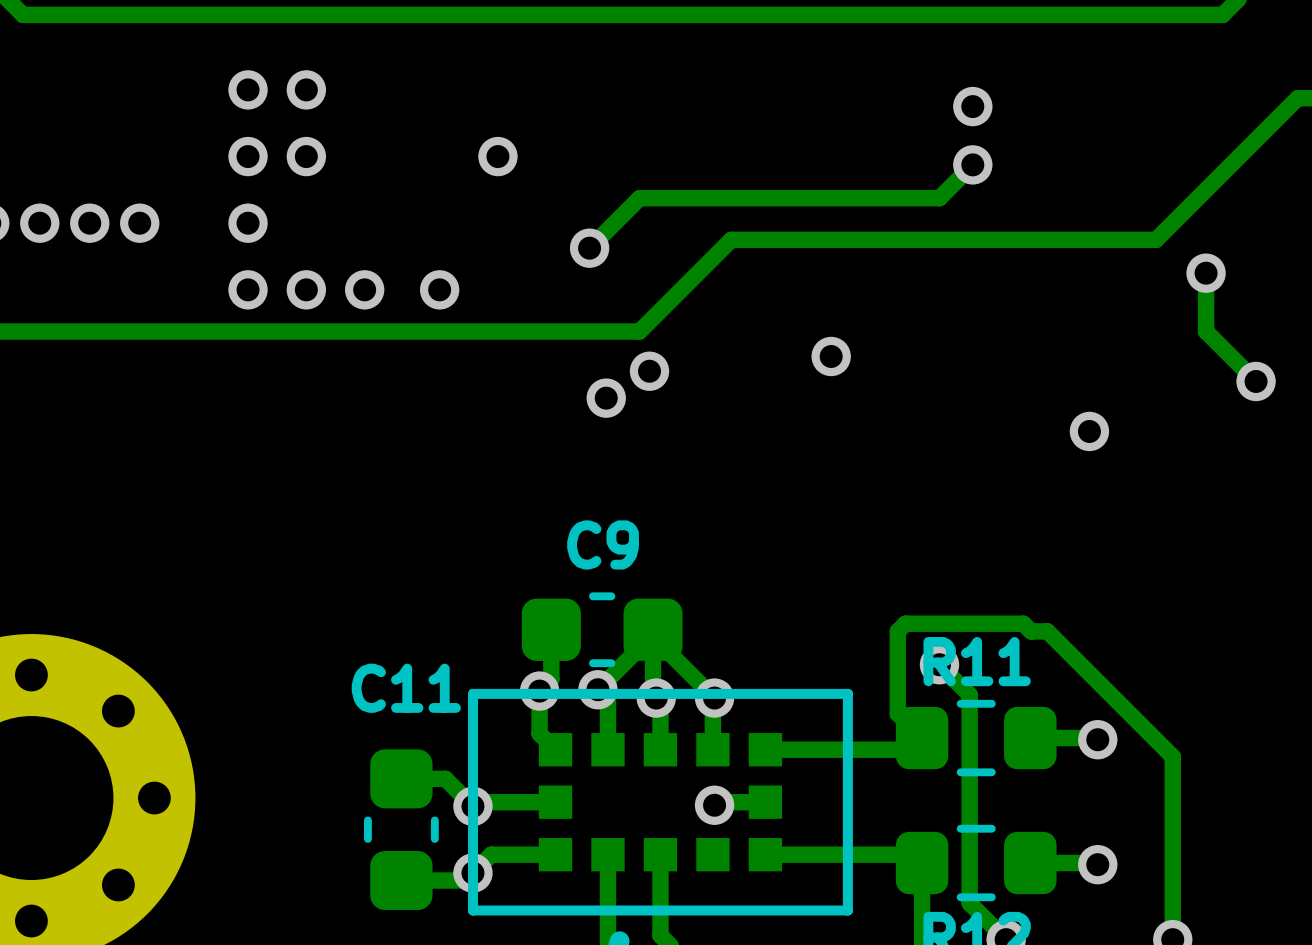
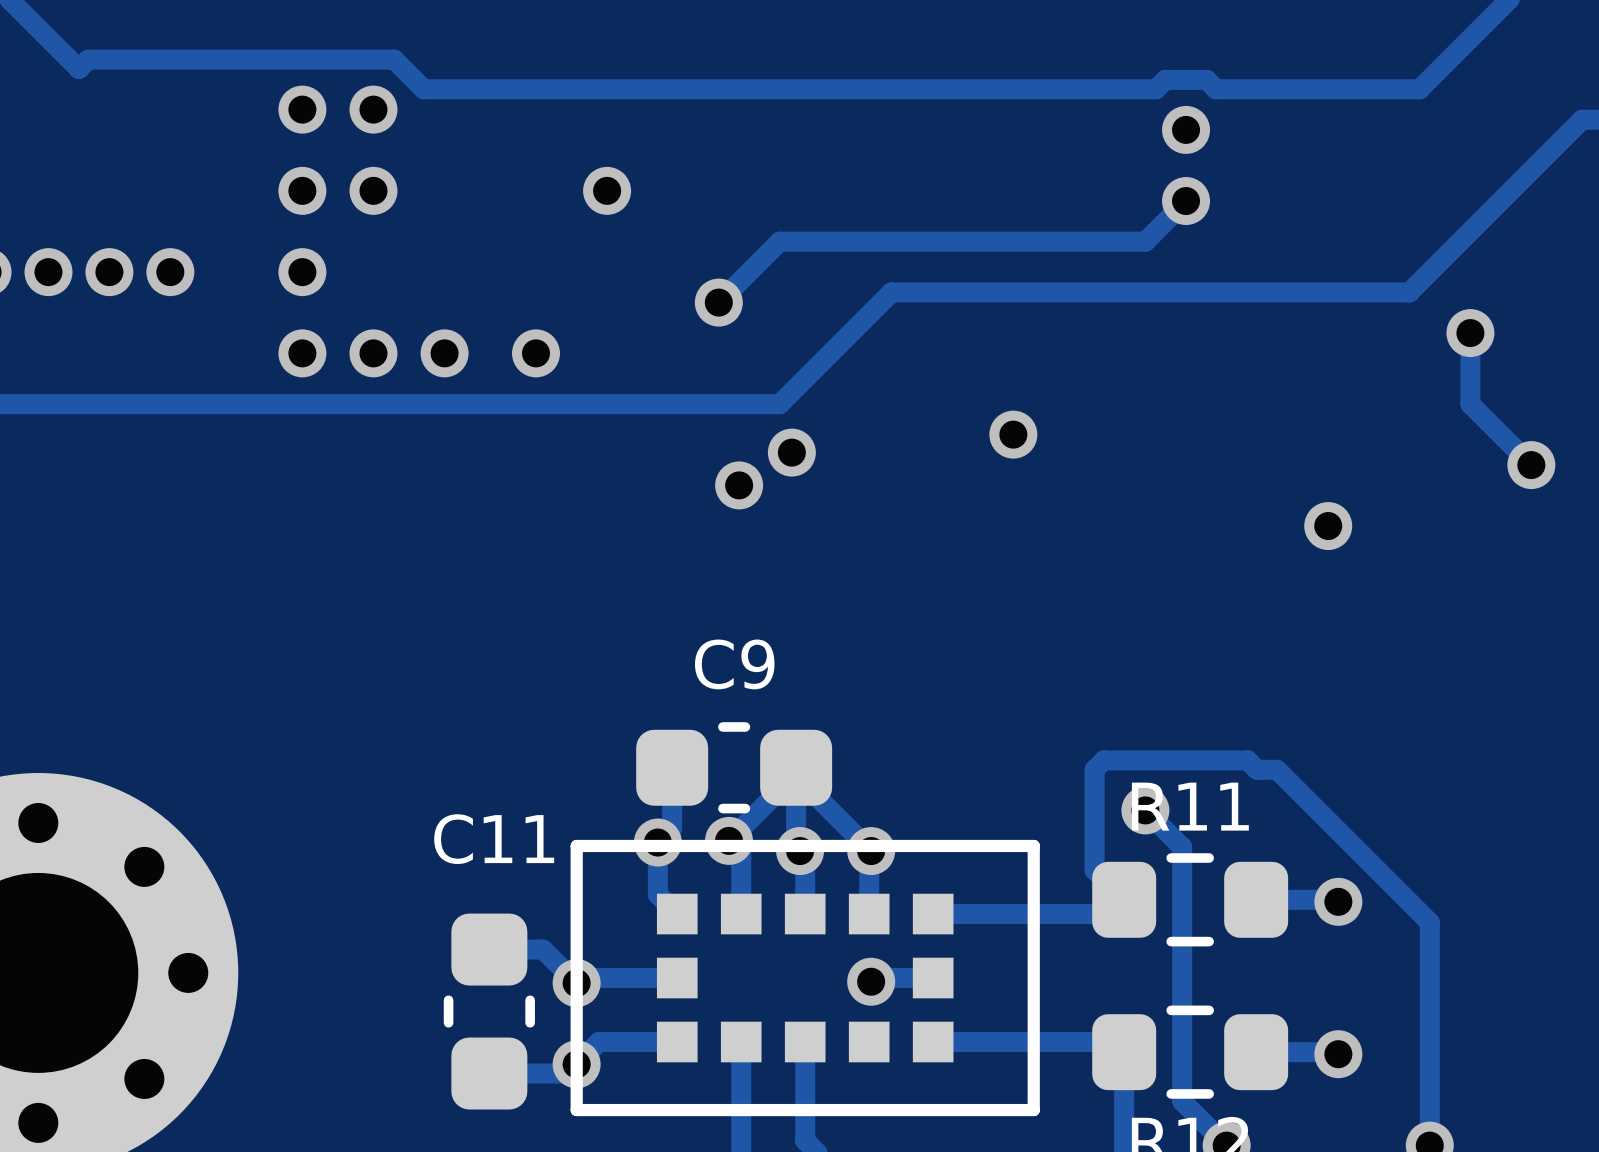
track: (1222, 14) (23, 14) -> (1490, 18) (1419, 89) (1216, 89) (1206, 79) (1165, 79) (1155, 89) (423, 89) (394, 59) (88, 59) (78, 68) (28, 18)

